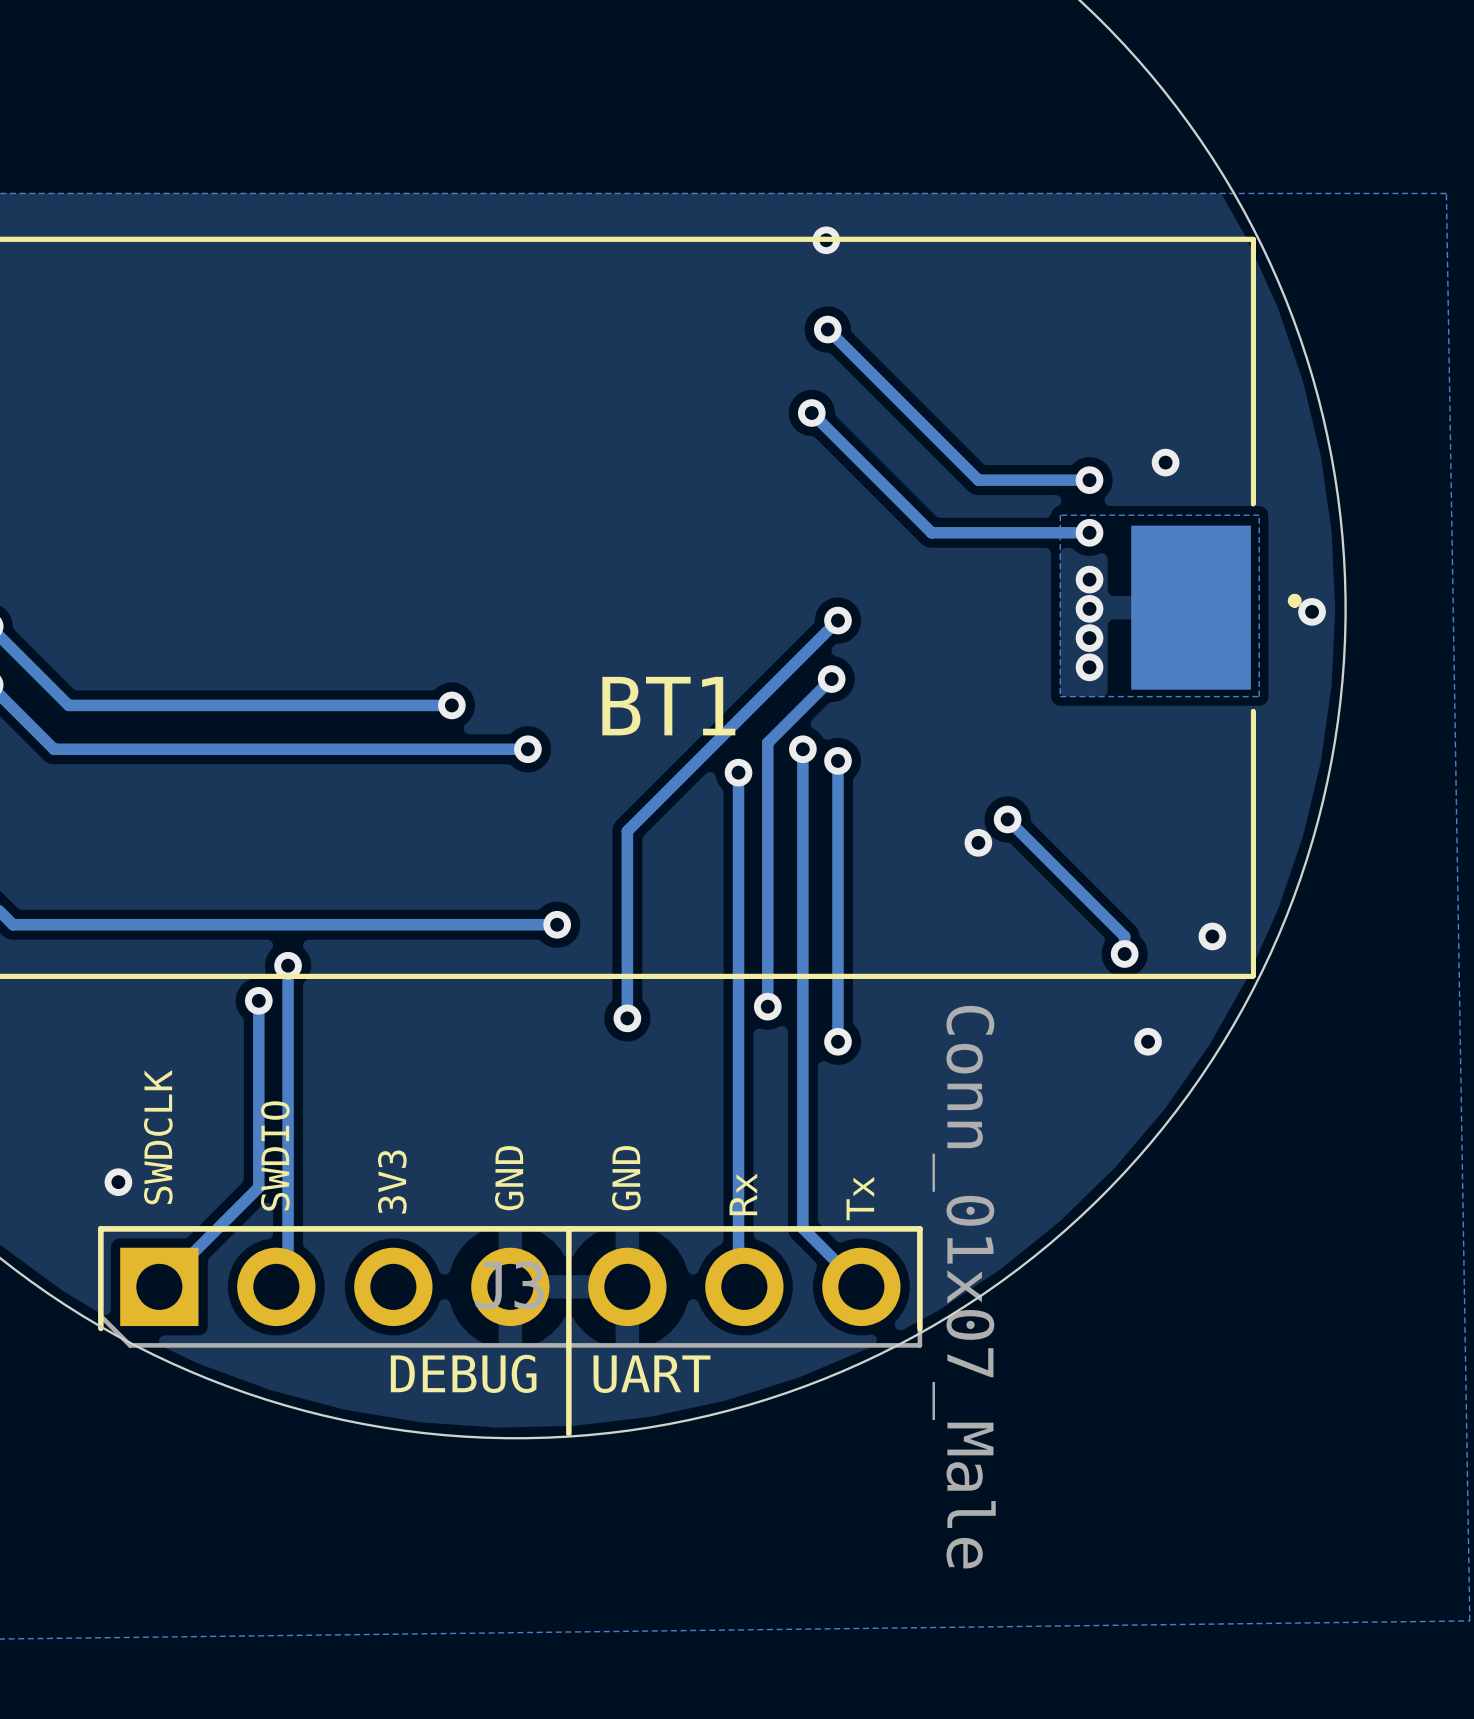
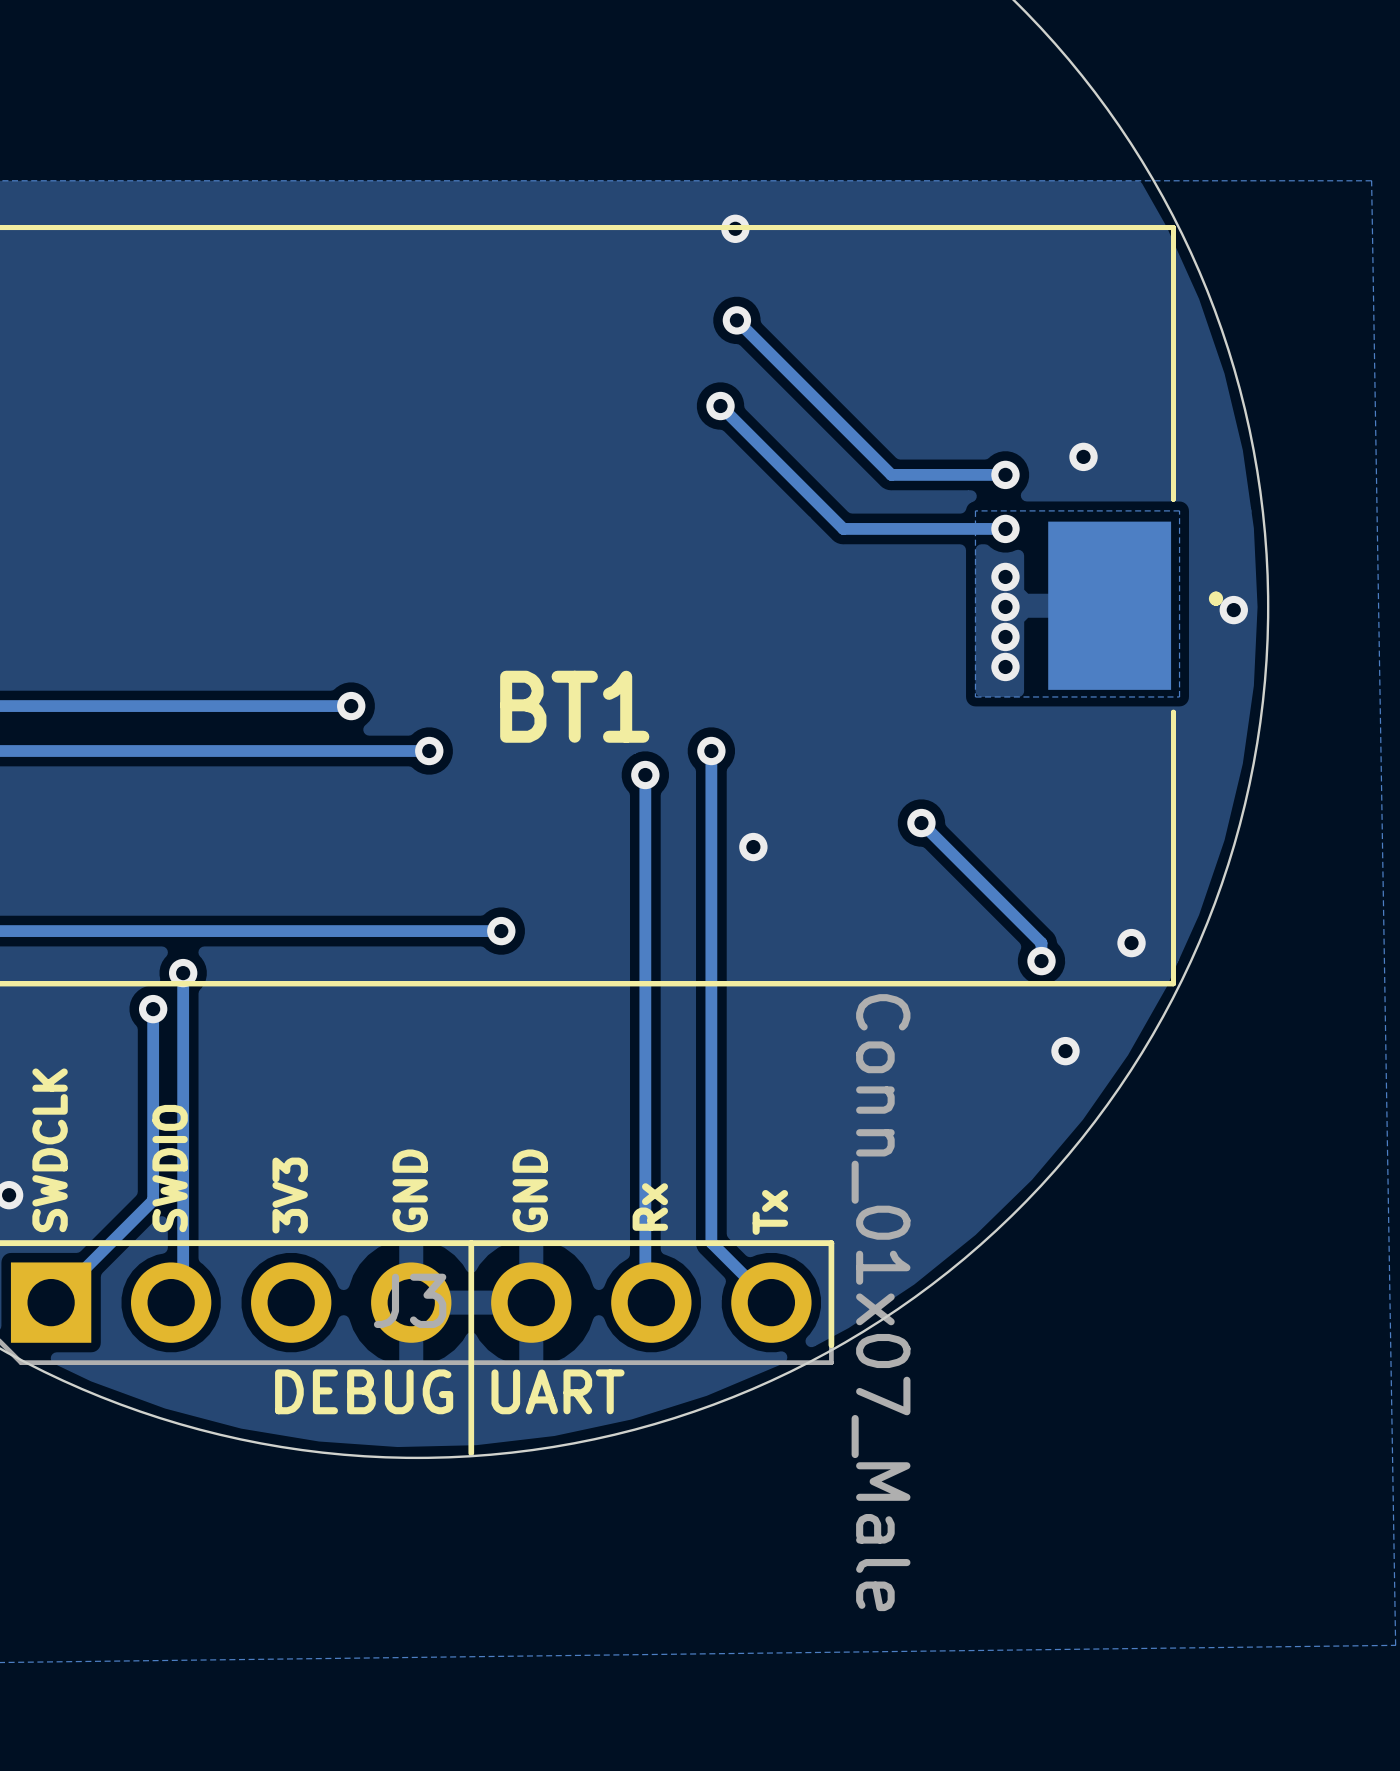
track: (837, 620) (627, 831) (627, 1018) -> none
via: (837, 620) -> none
track: (831, 679) (767, 742) (767, 1006) -> none
via: (831, 679) -> none
track: (837, 760) (837, 1041) -> none
via: (837, 760) -> none
via: none -> (753, 847)
via: (978, 842) -> none
via position: (557, 924) -> (501, 931)
track: none -> (501, 931) (459, 931)
via: (767, 1006) -> none
via: (627, 1018) -> none
via: (837, 1041) -> none

